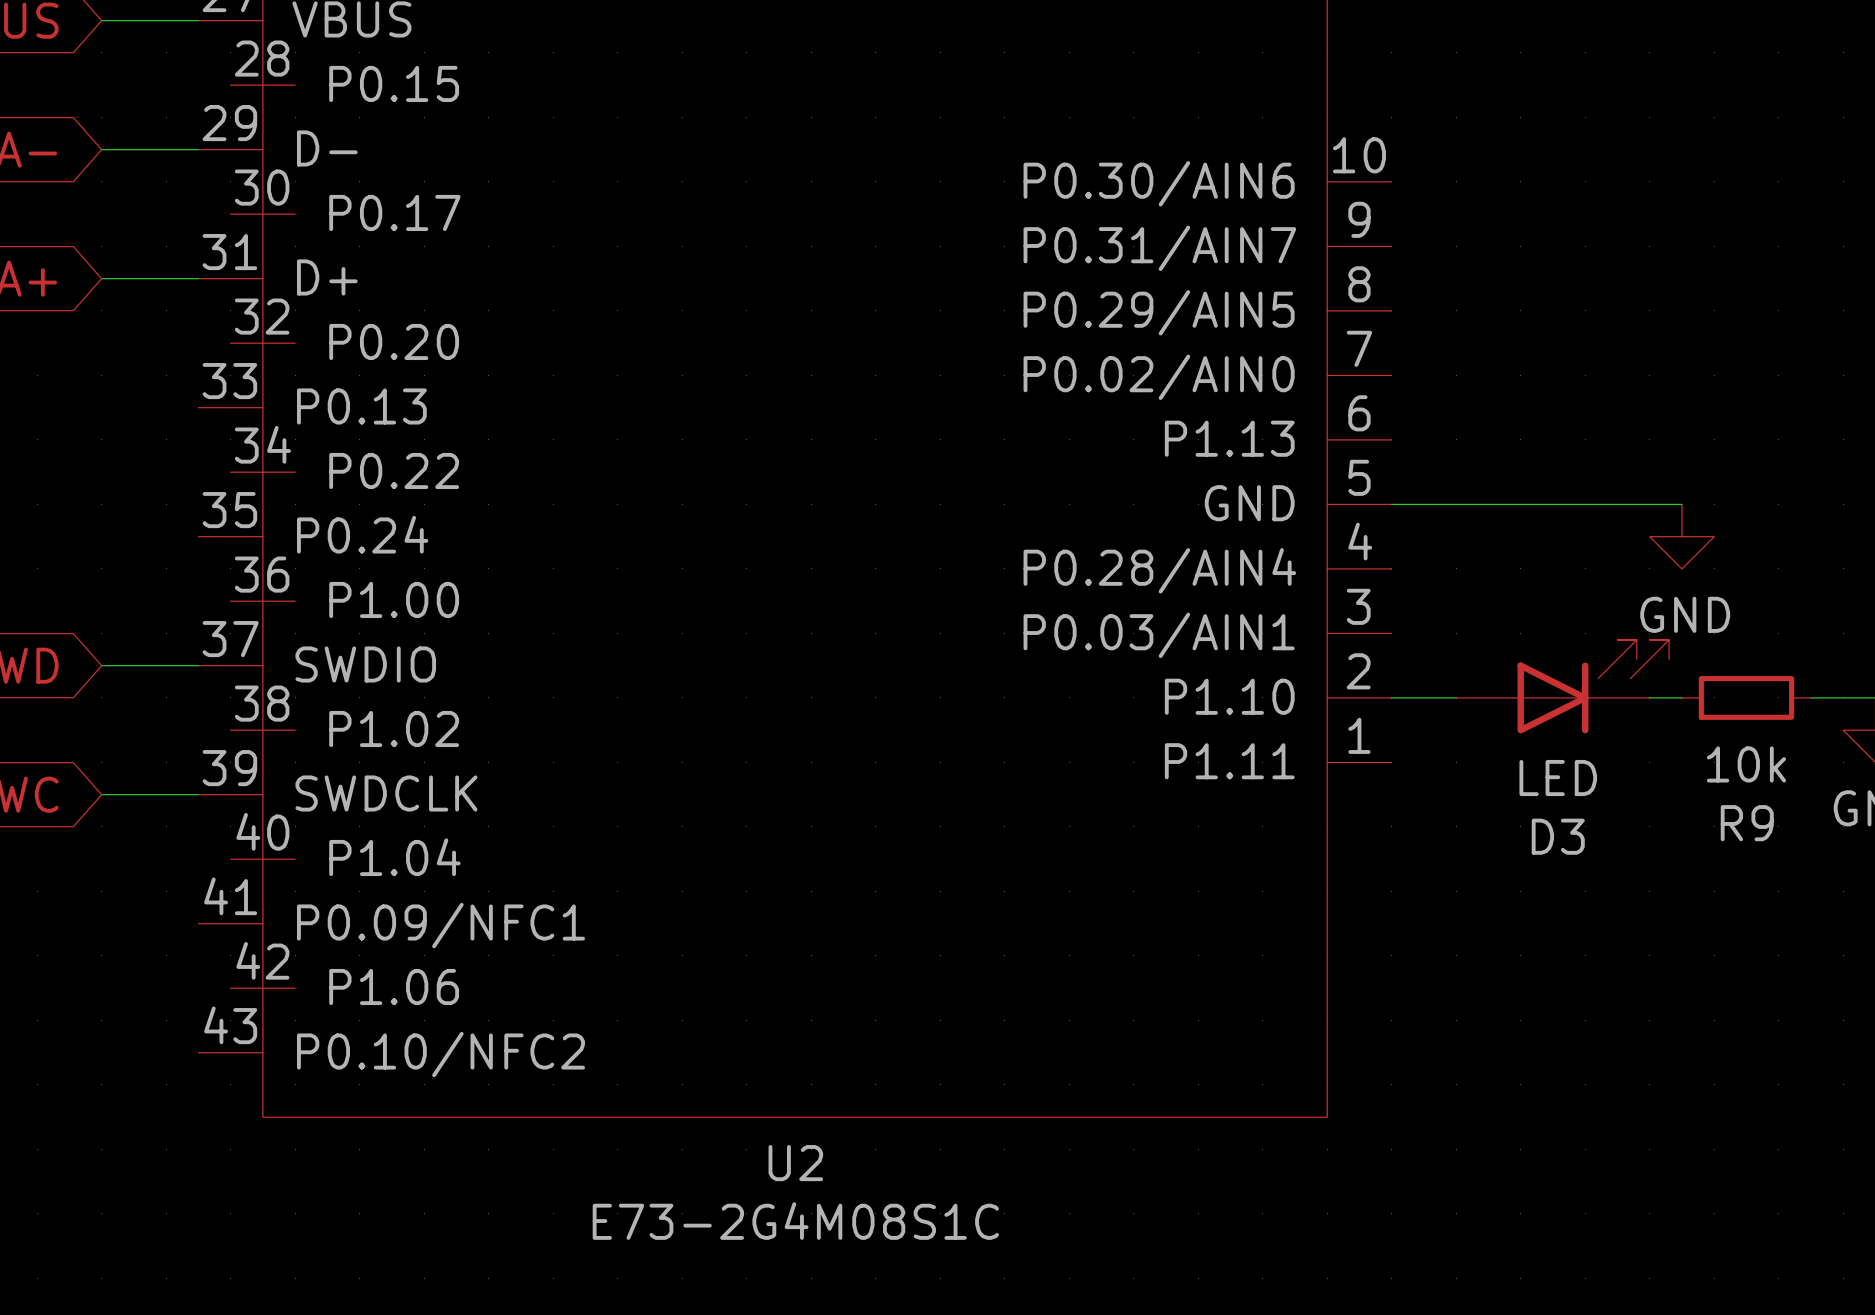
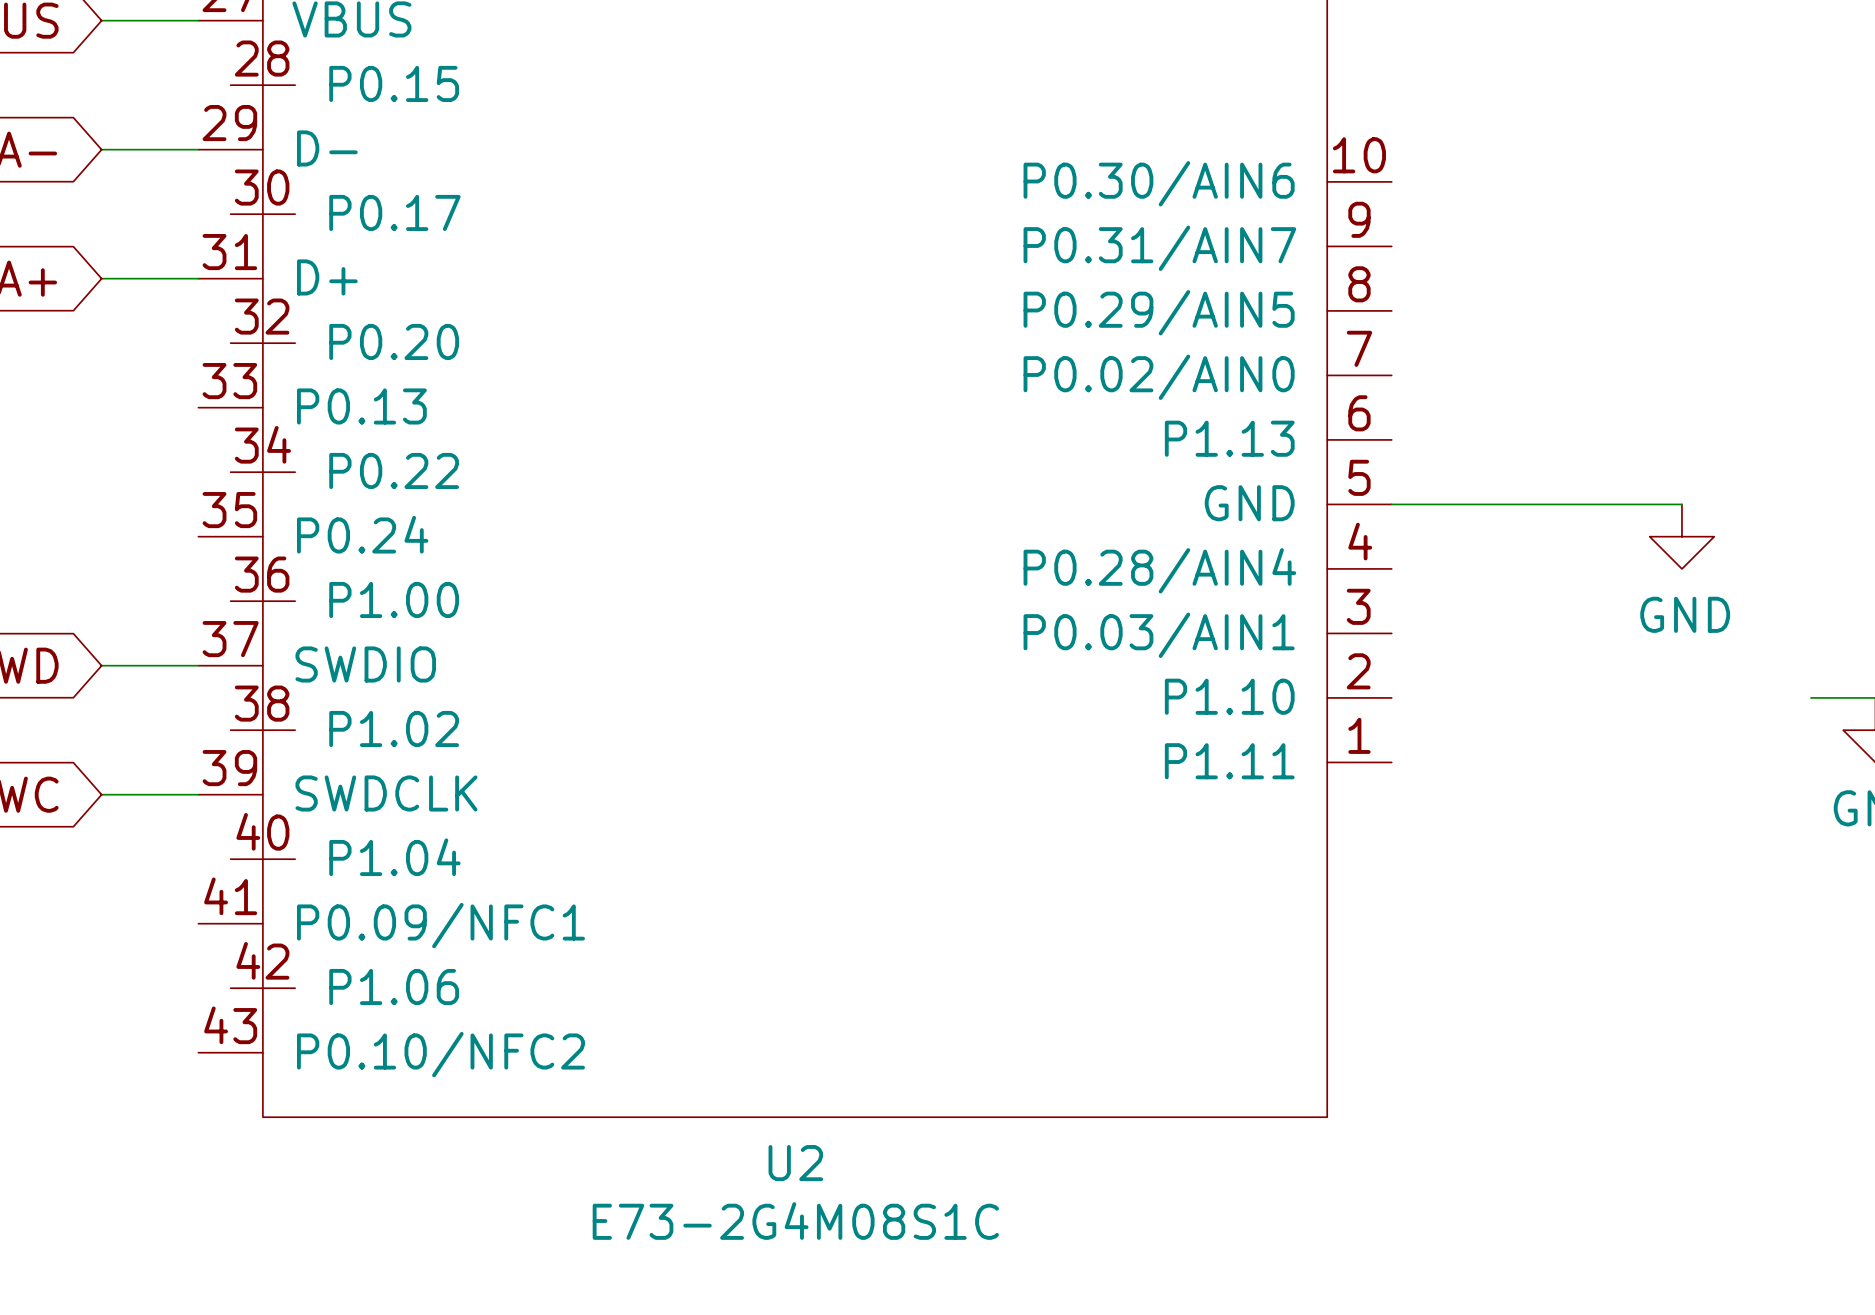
D3: LED (1562, 686) -> none
wire: (1391, 697) (1456, 697) -> none
wire: (1649, 697) (1681, 697) -> none
R9: 10k (1746, 697) -> none

